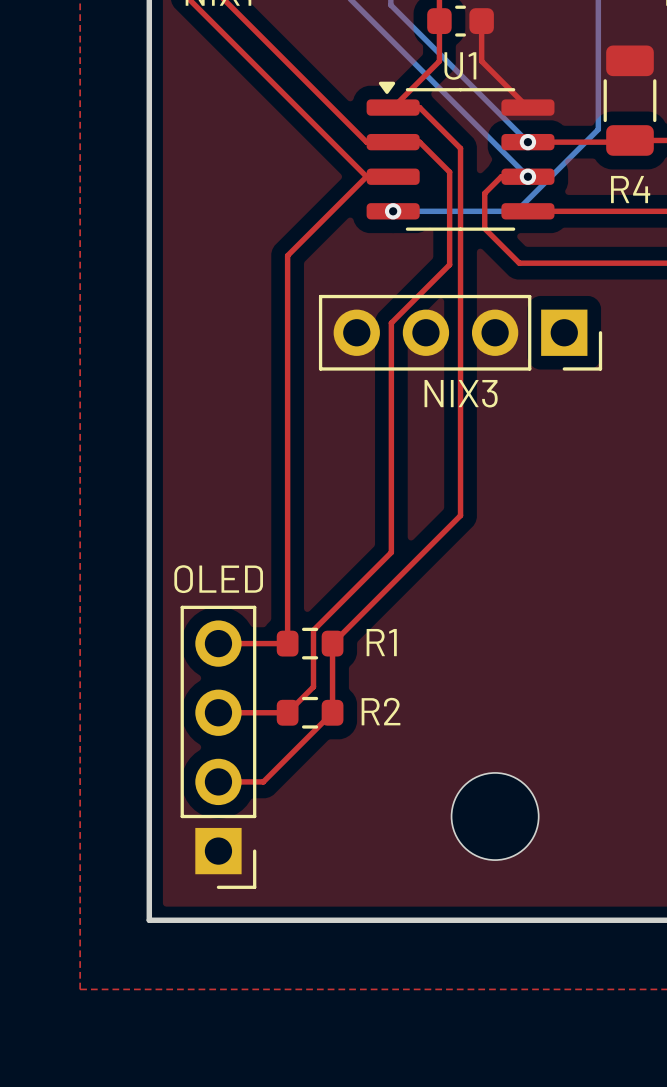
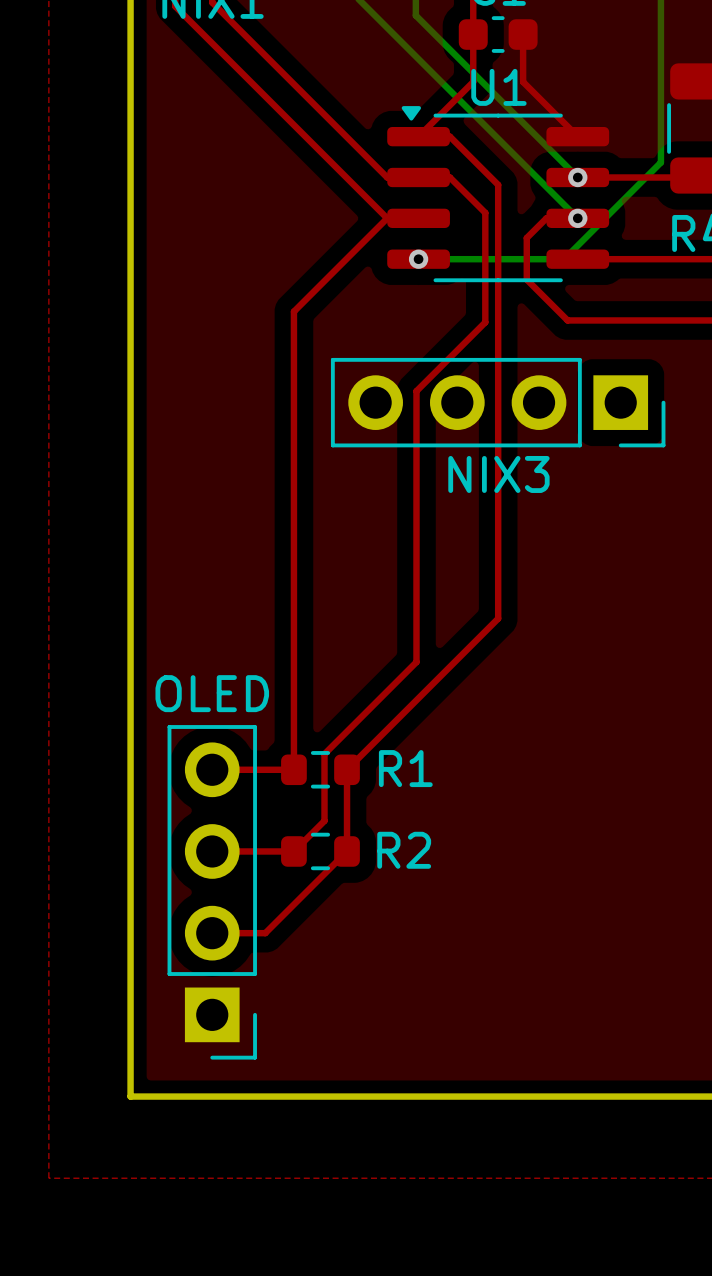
part: (495, 816) -> none

